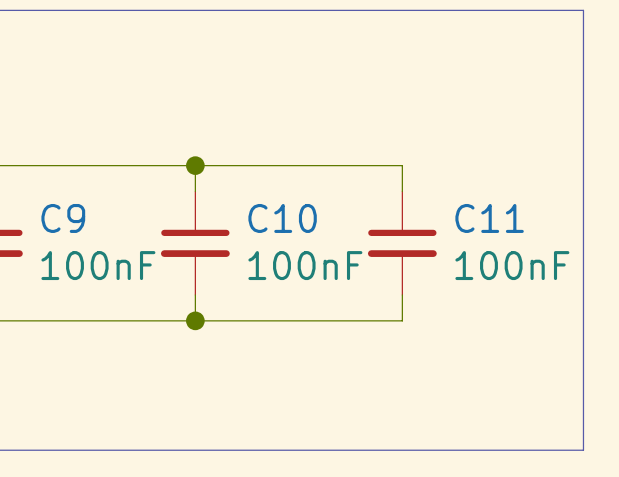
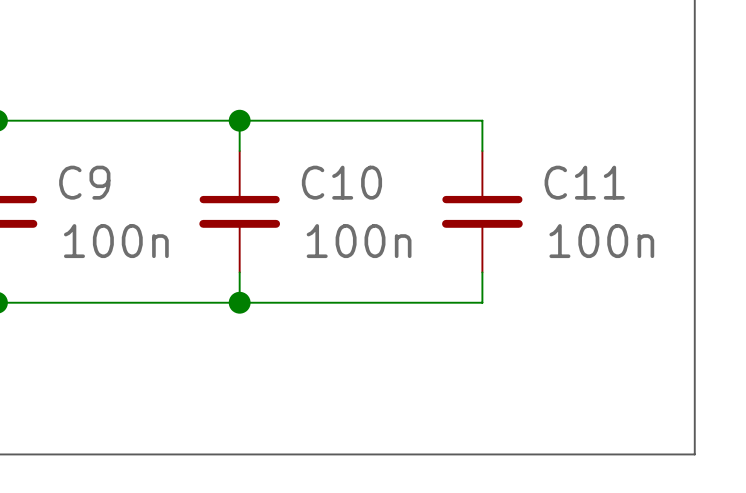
C9 value: 100nF (98, 265) -> 100n (116, 241)
C10 value: 100nF (305, 265) -> 100n (359, 241)
C11 value: 100nF (512, 265) -> 100n (601, 241)

